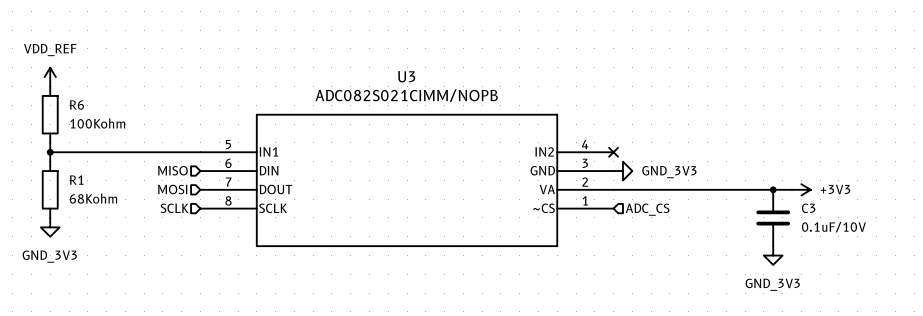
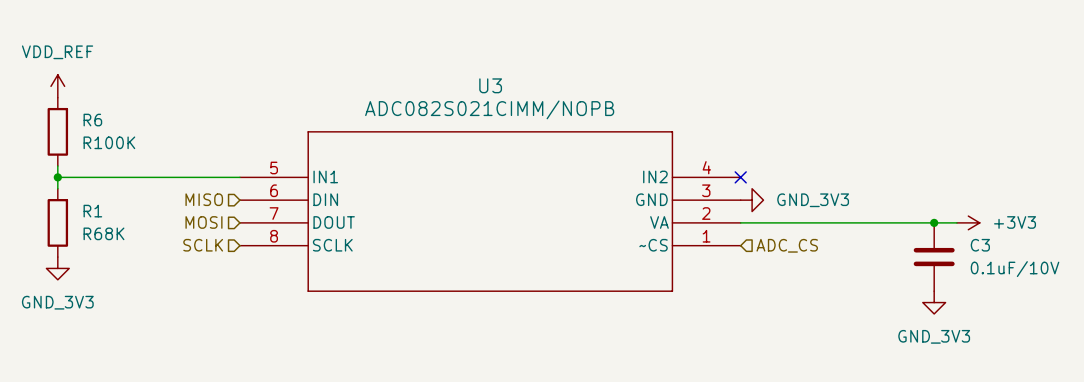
R6 value: 100Kohm (97, 123) -> R100K (109, 142)
R1 value: 68Kohm (93, 198) -> R68K (103, 233)

